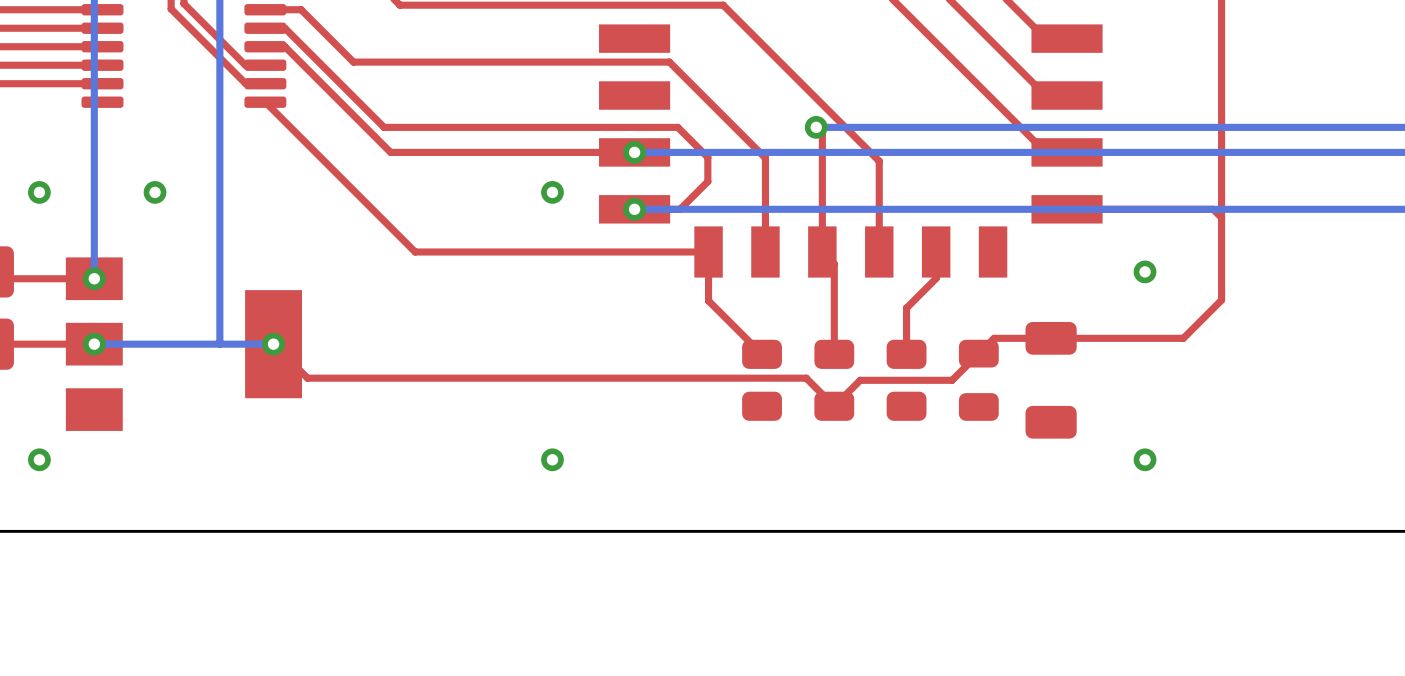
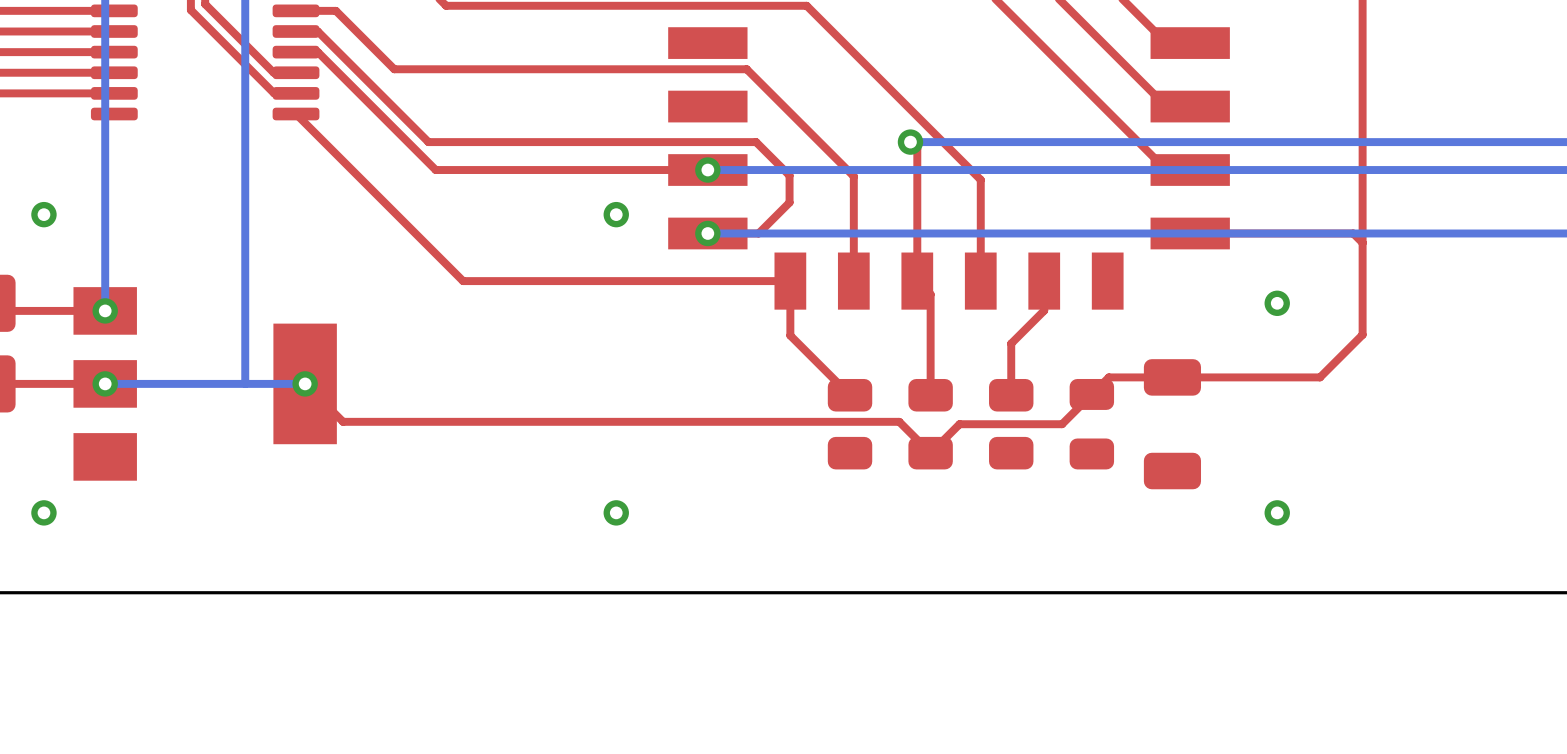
via: (155, 192) -> none

